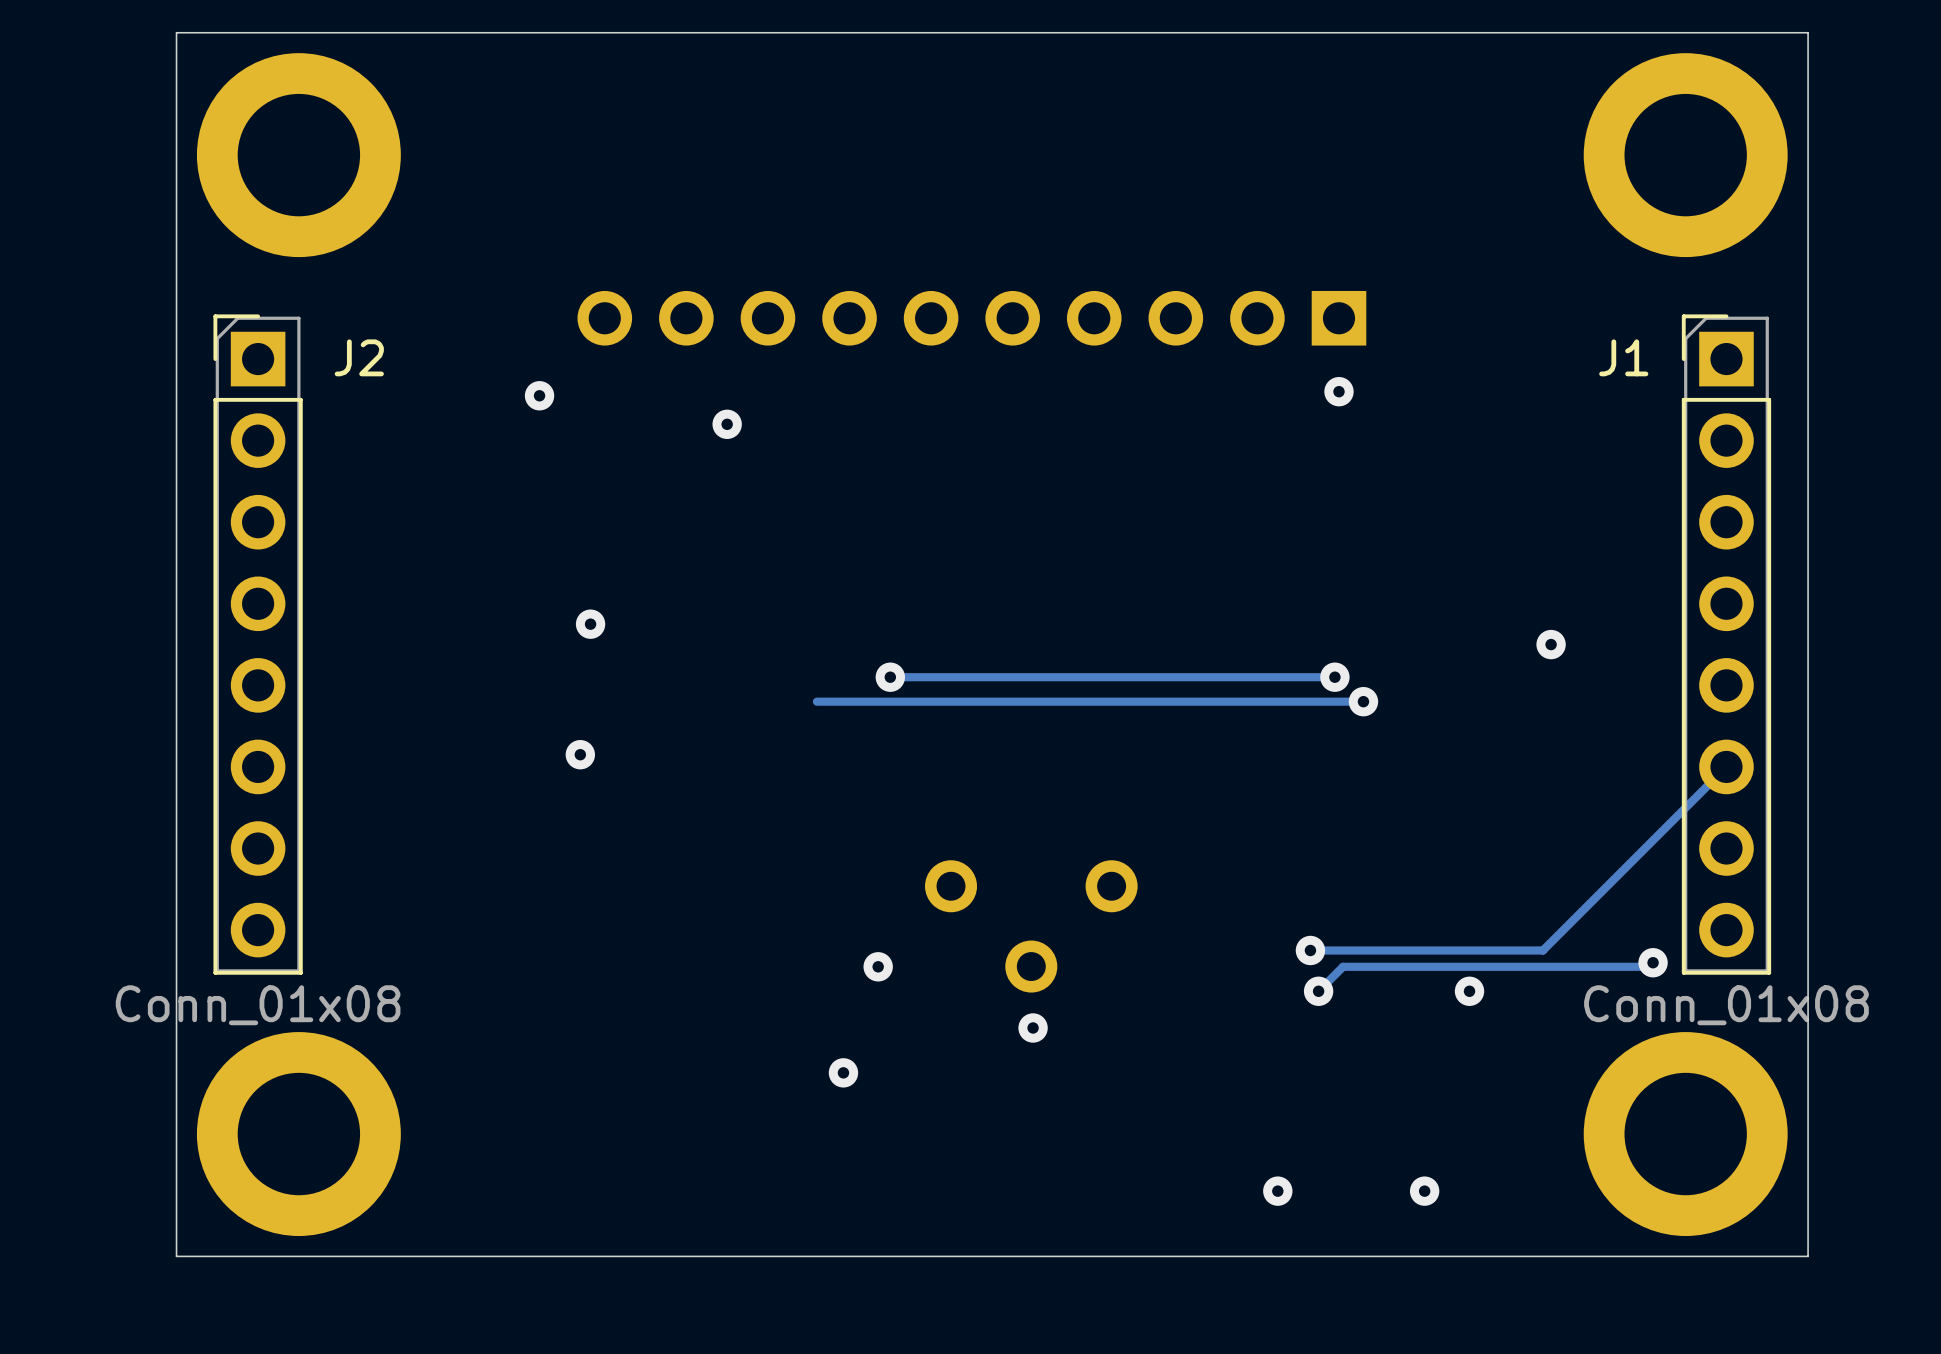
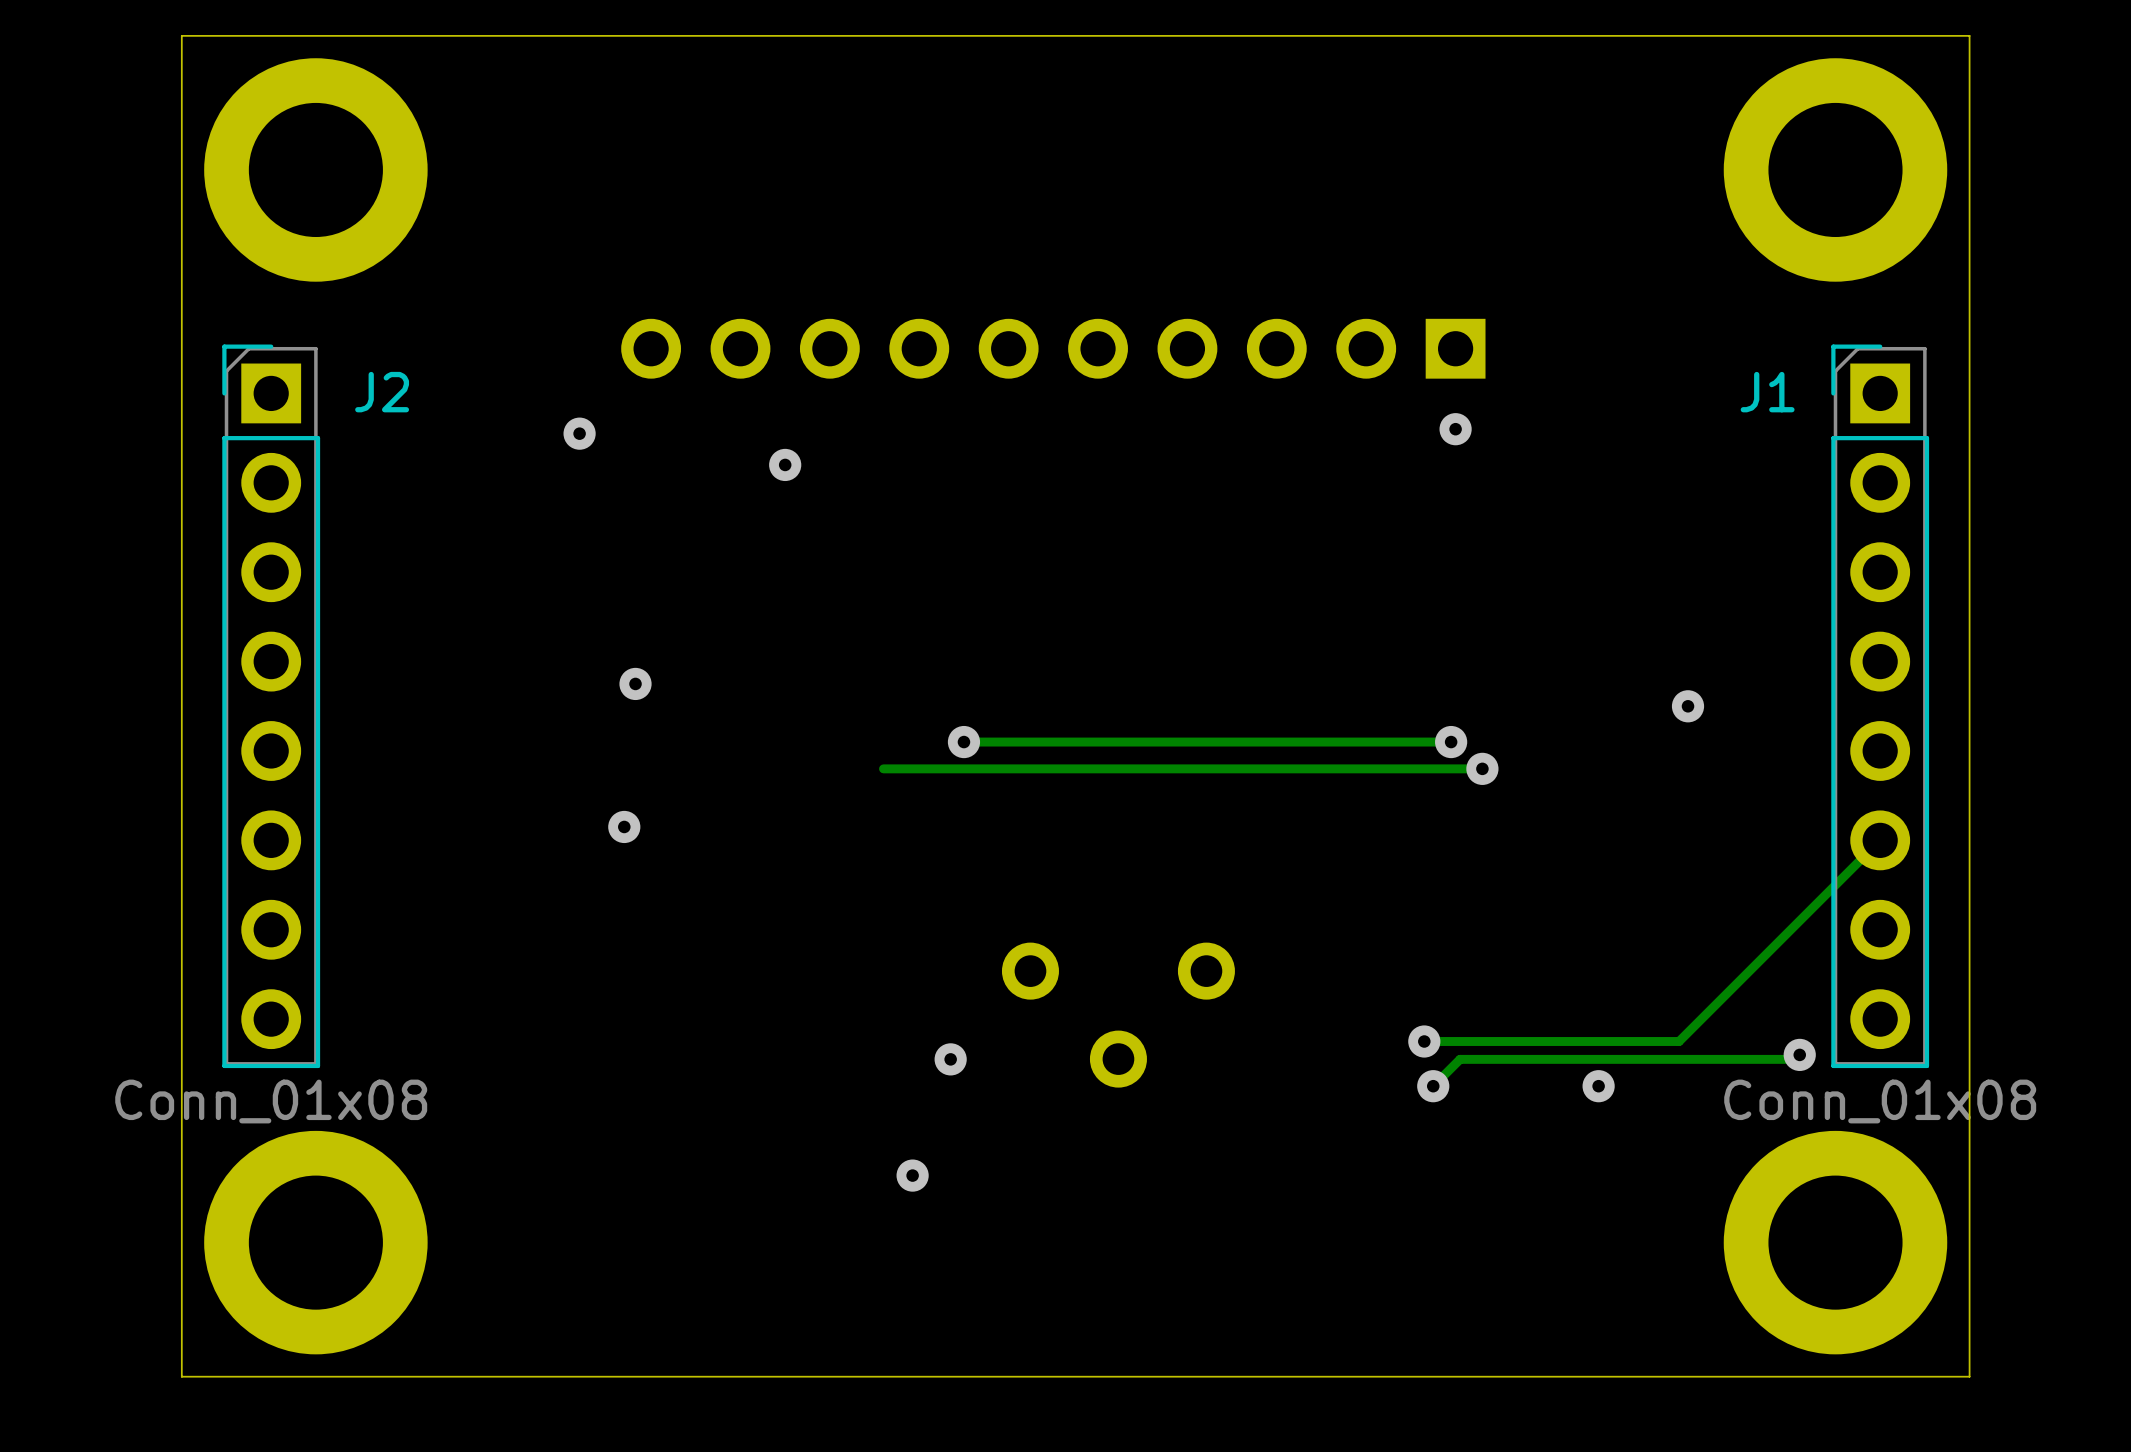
via: (1033, 1027) -> none
via: (1277, 1191) -> none
via: (1424, 1191) -> none

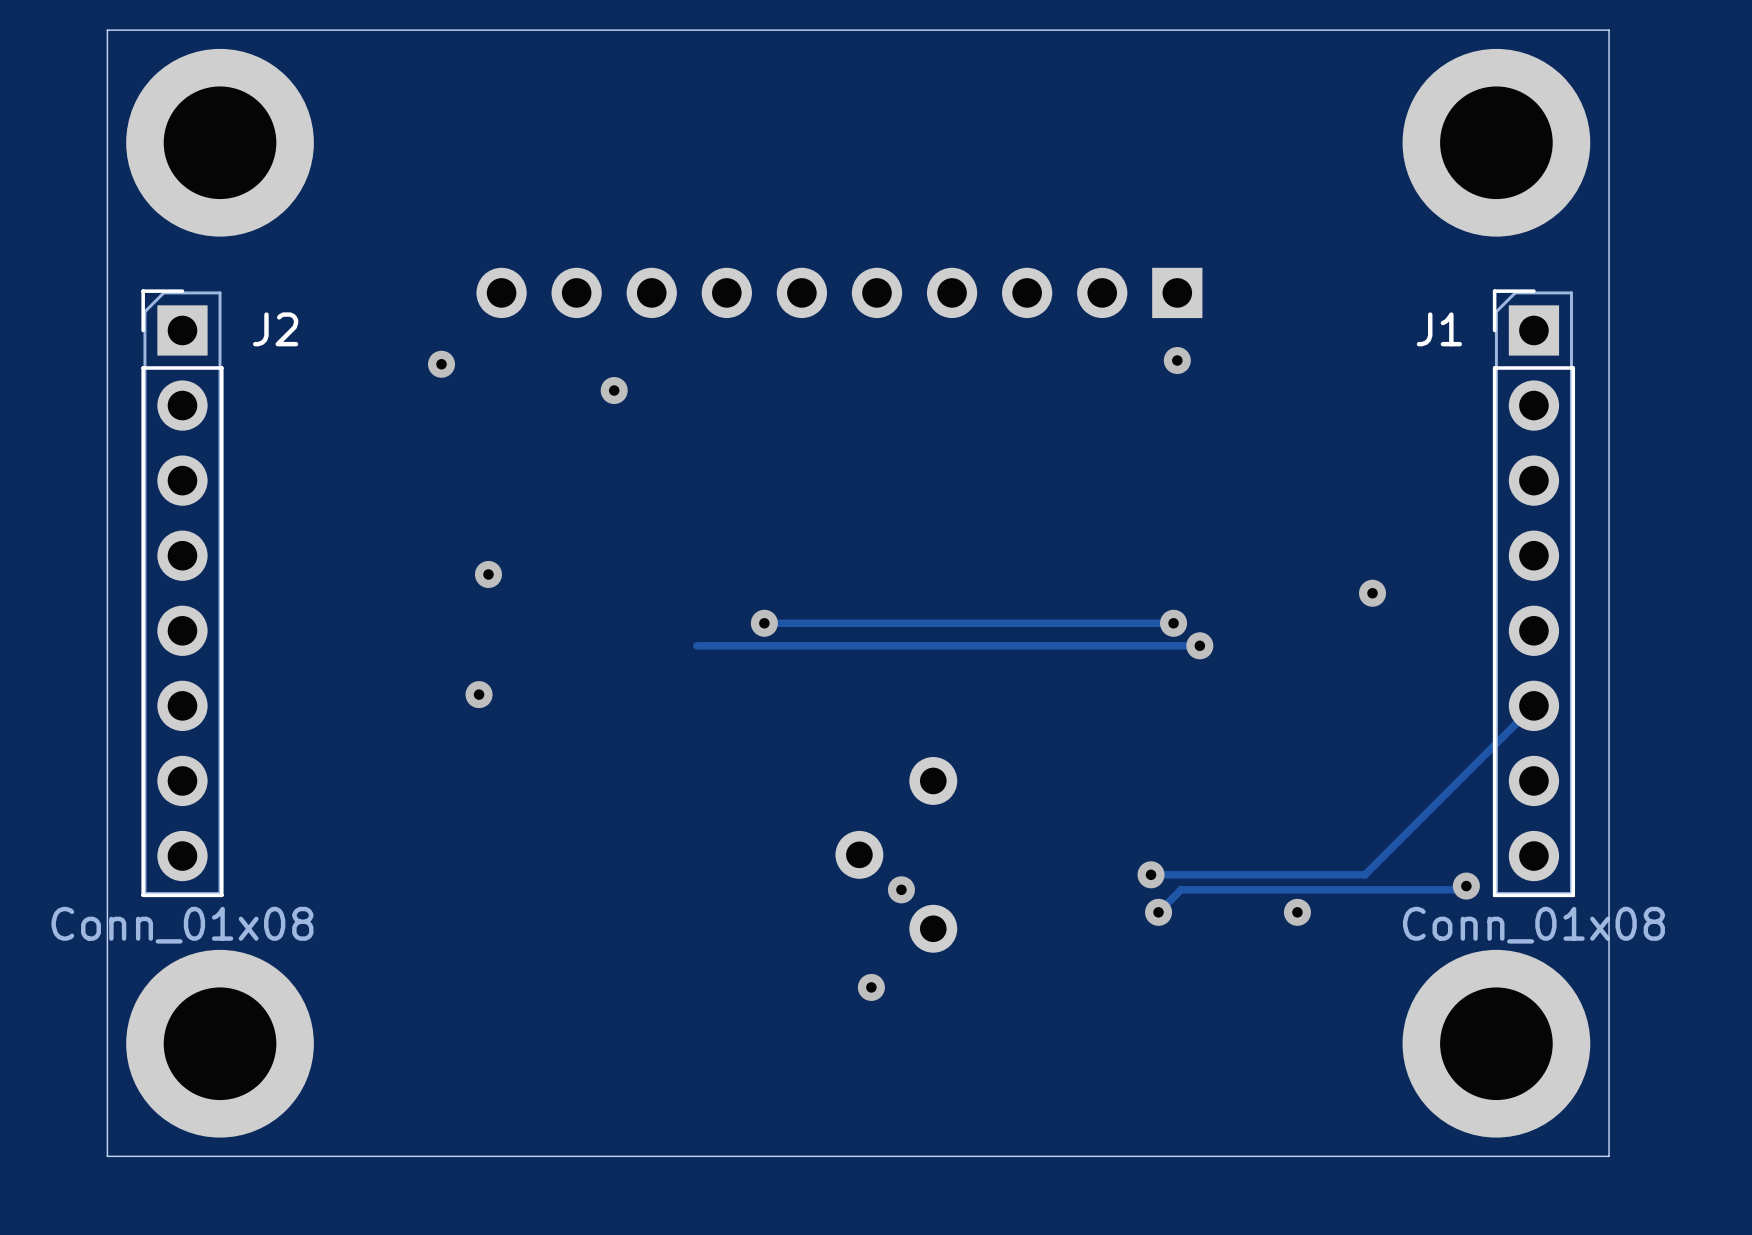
part rotation: 0° (1118, 1015) -> 90° clockwise (896, 854)
via: (950, 1059) -> none
via: none -> (901, 889)
via: (912, 1175) -> none
via: none -> (871, 987)

